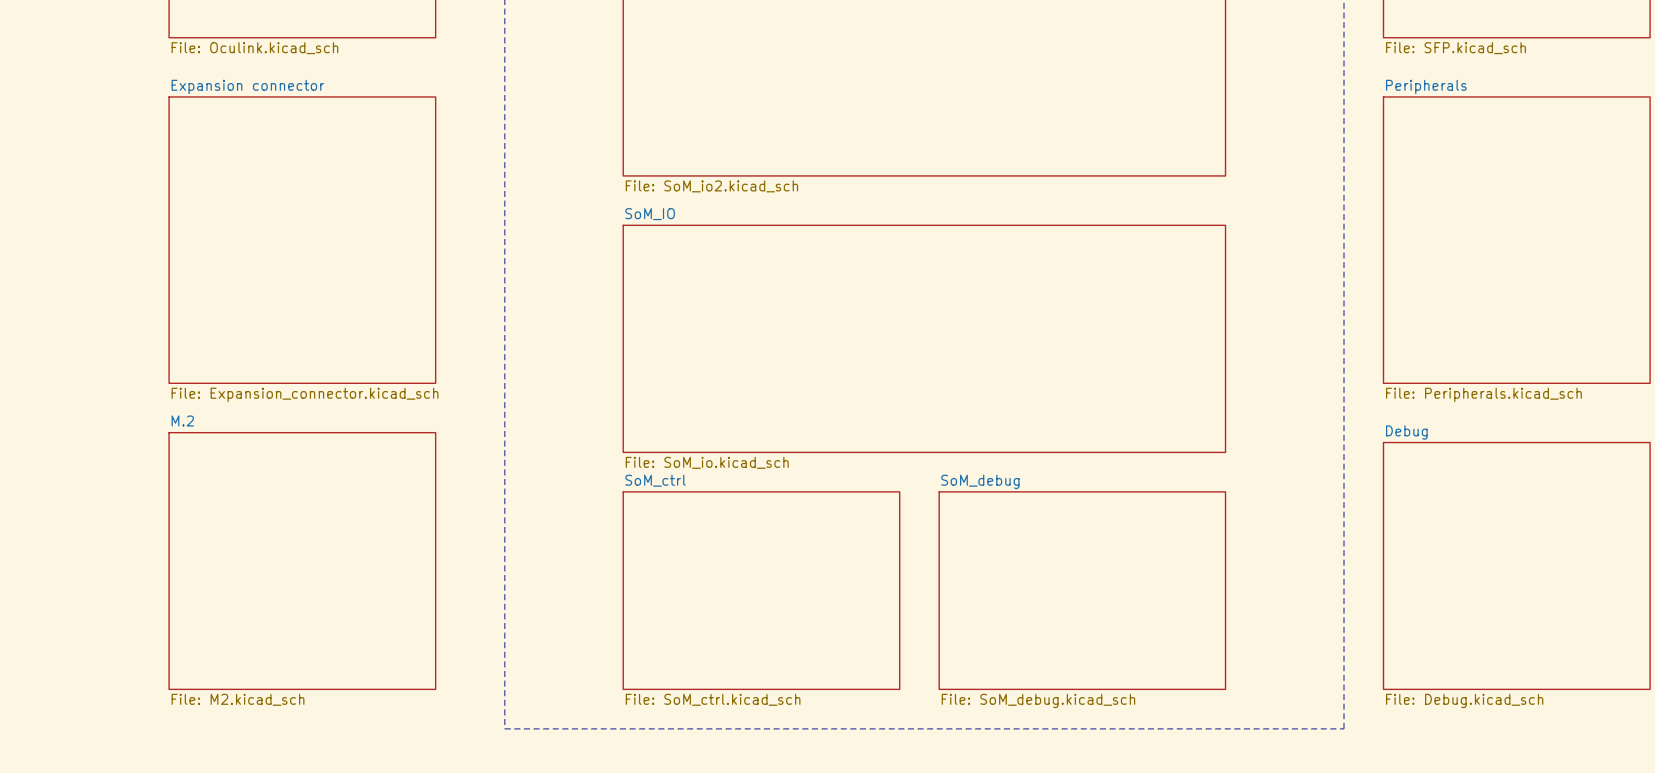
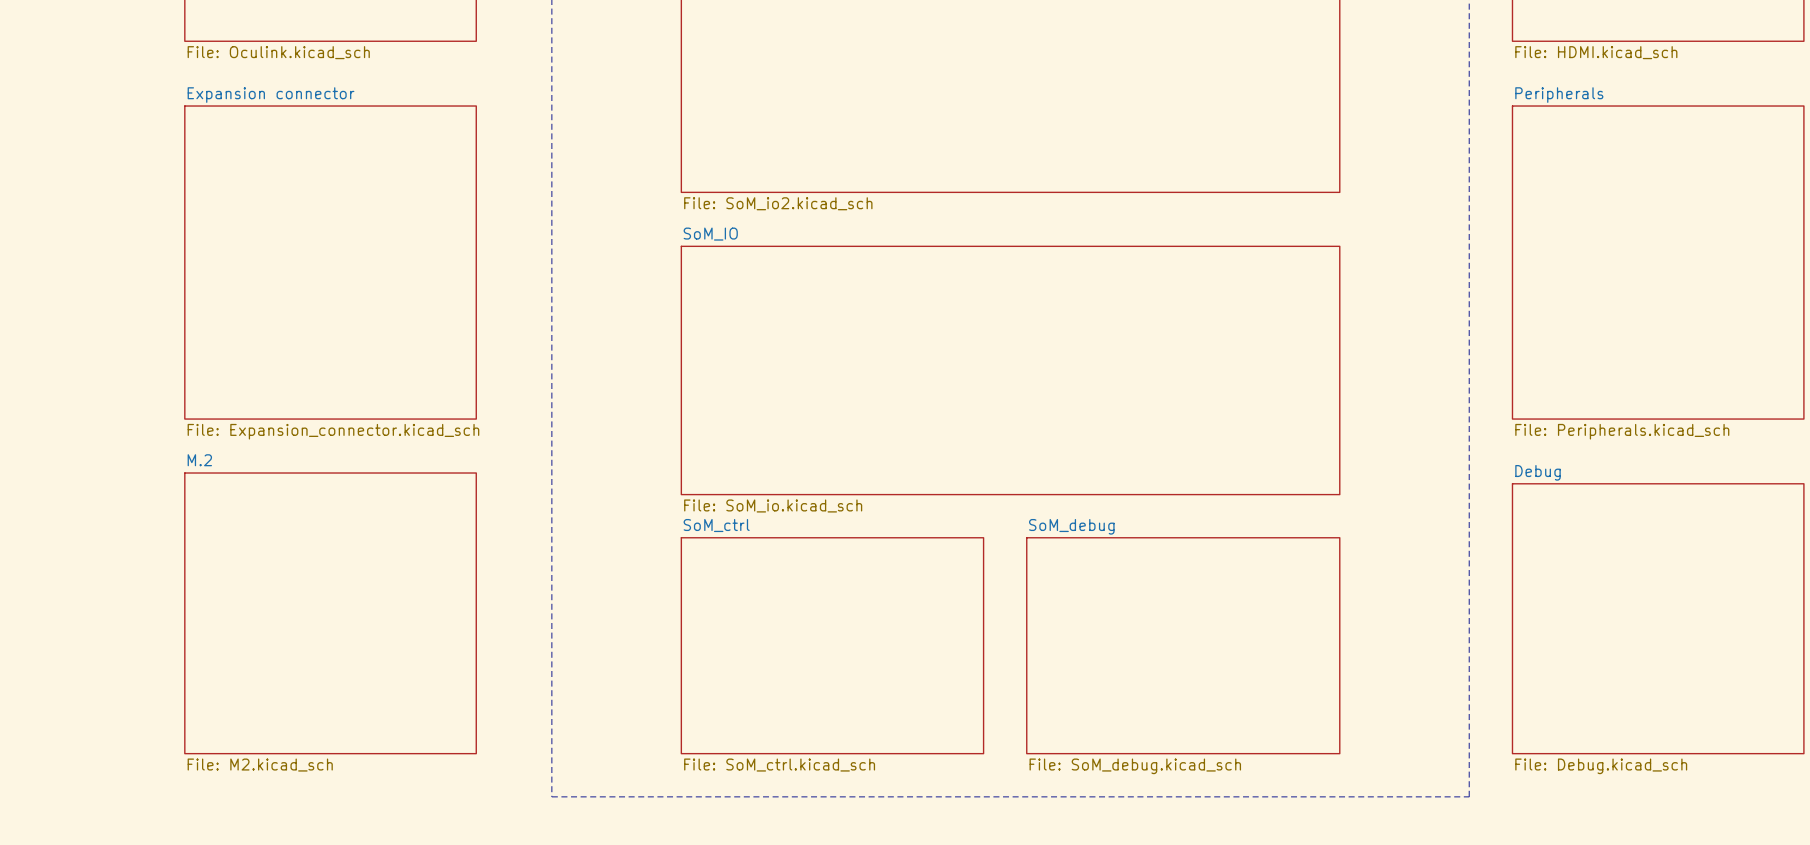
sheet value: File: SFP.kicad_sch (1455, 48) -> File: HDMI.kicad_sch (1596, 52)

